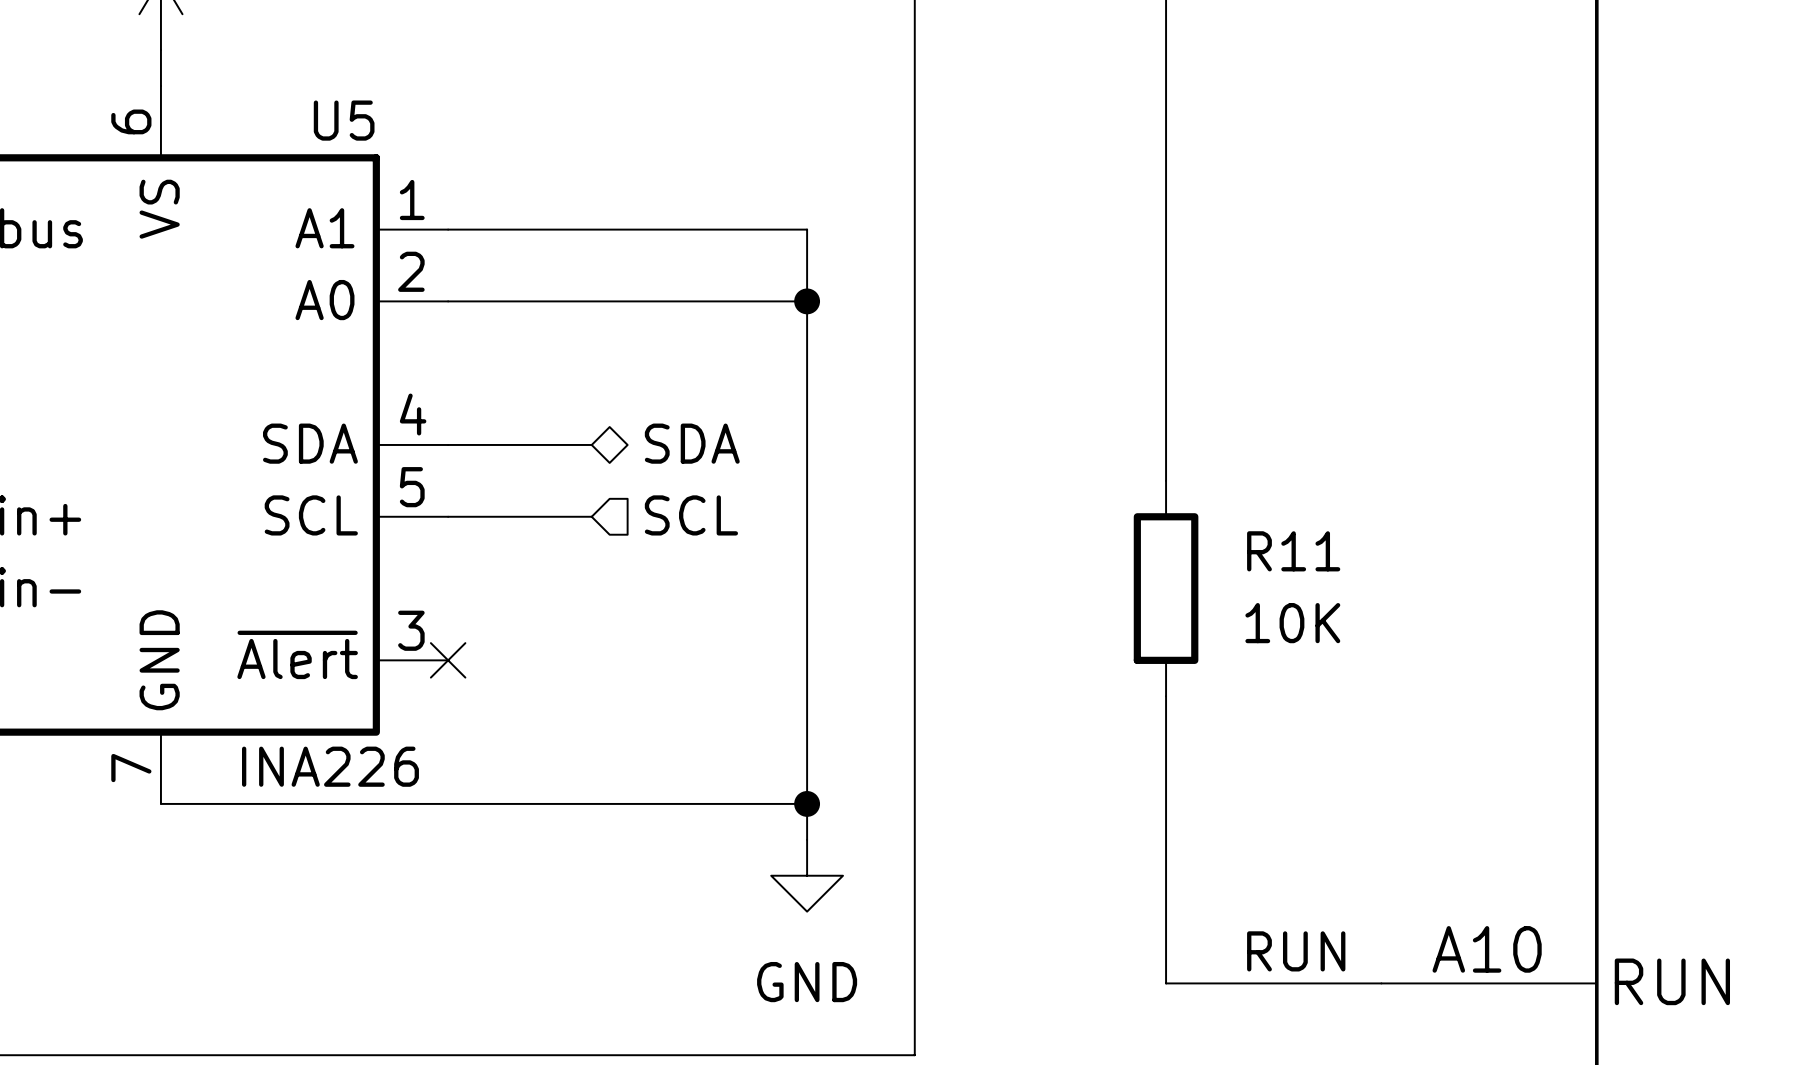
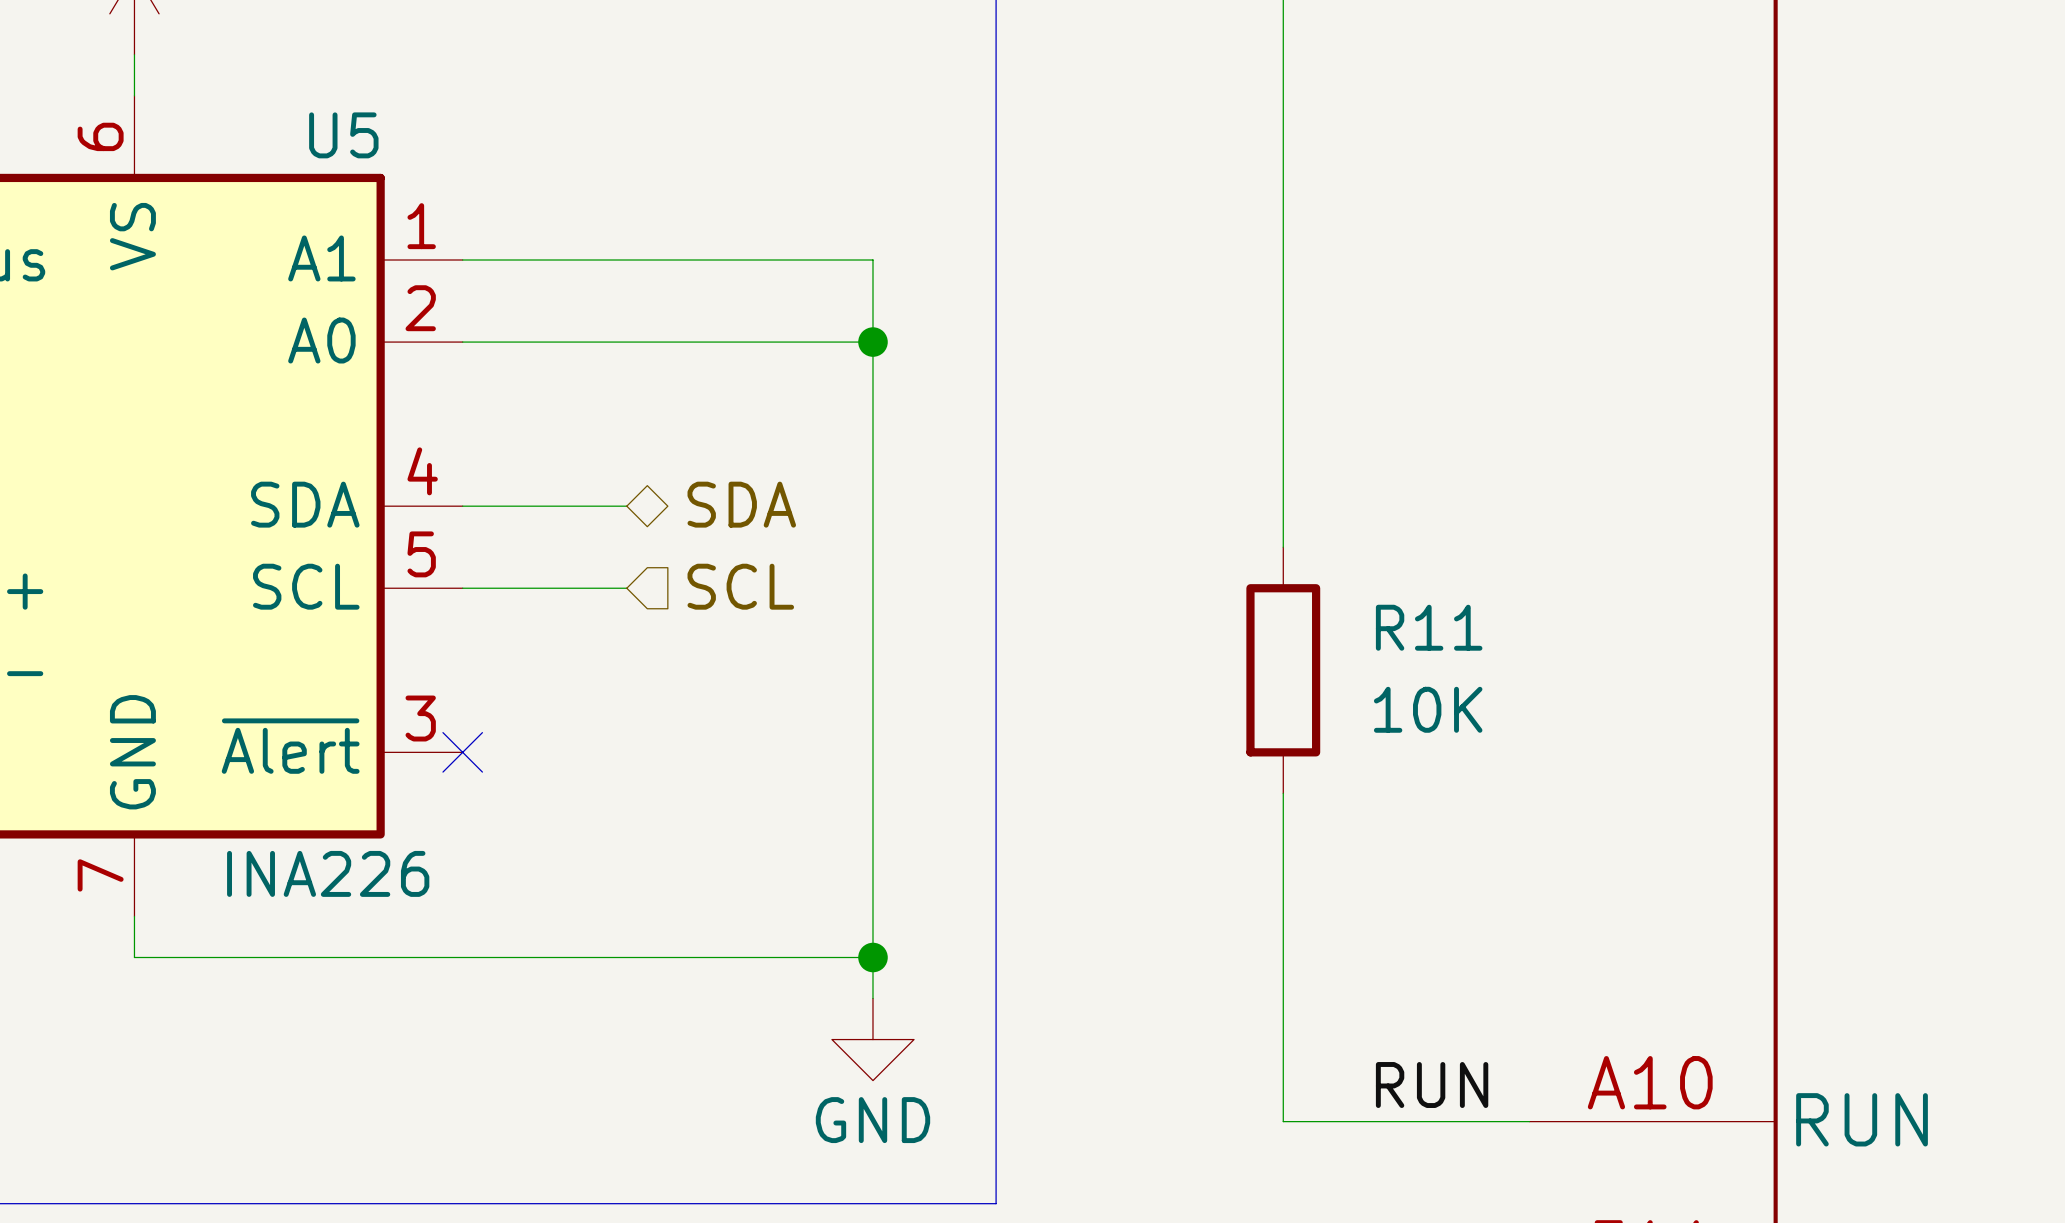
wire: (160, 803) (807, 803) -> (134, 916) (134, 957) (872, 957) (872, 998)
junction position: (807, 803) -> (872, 957)
power symbol position: GND (807, 875) -> GND (872, 1039)

